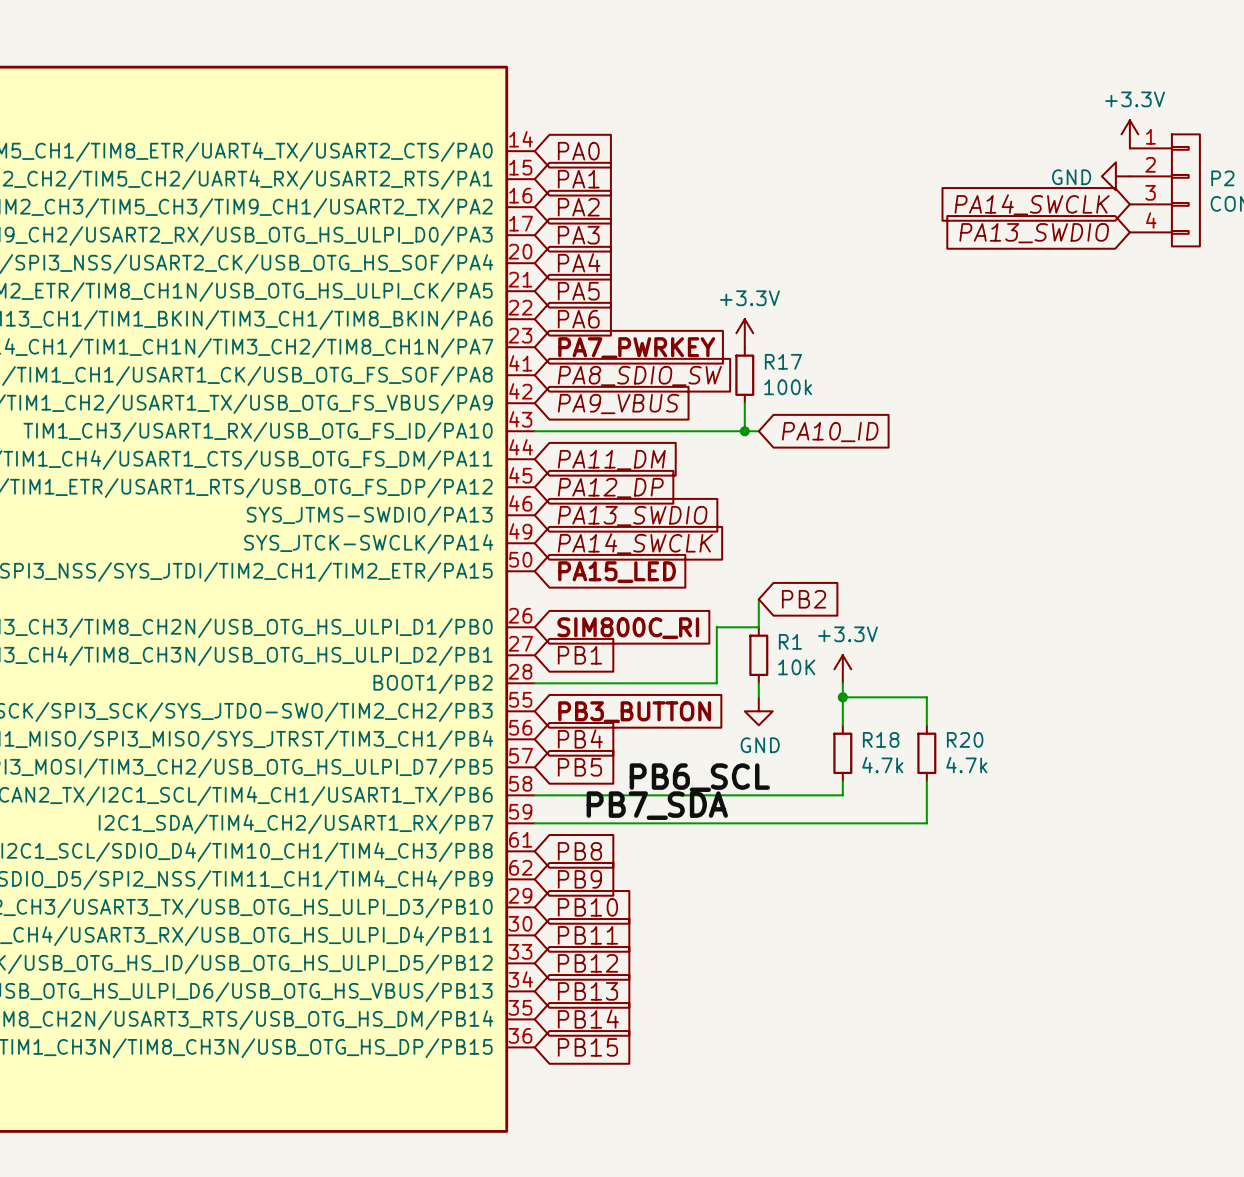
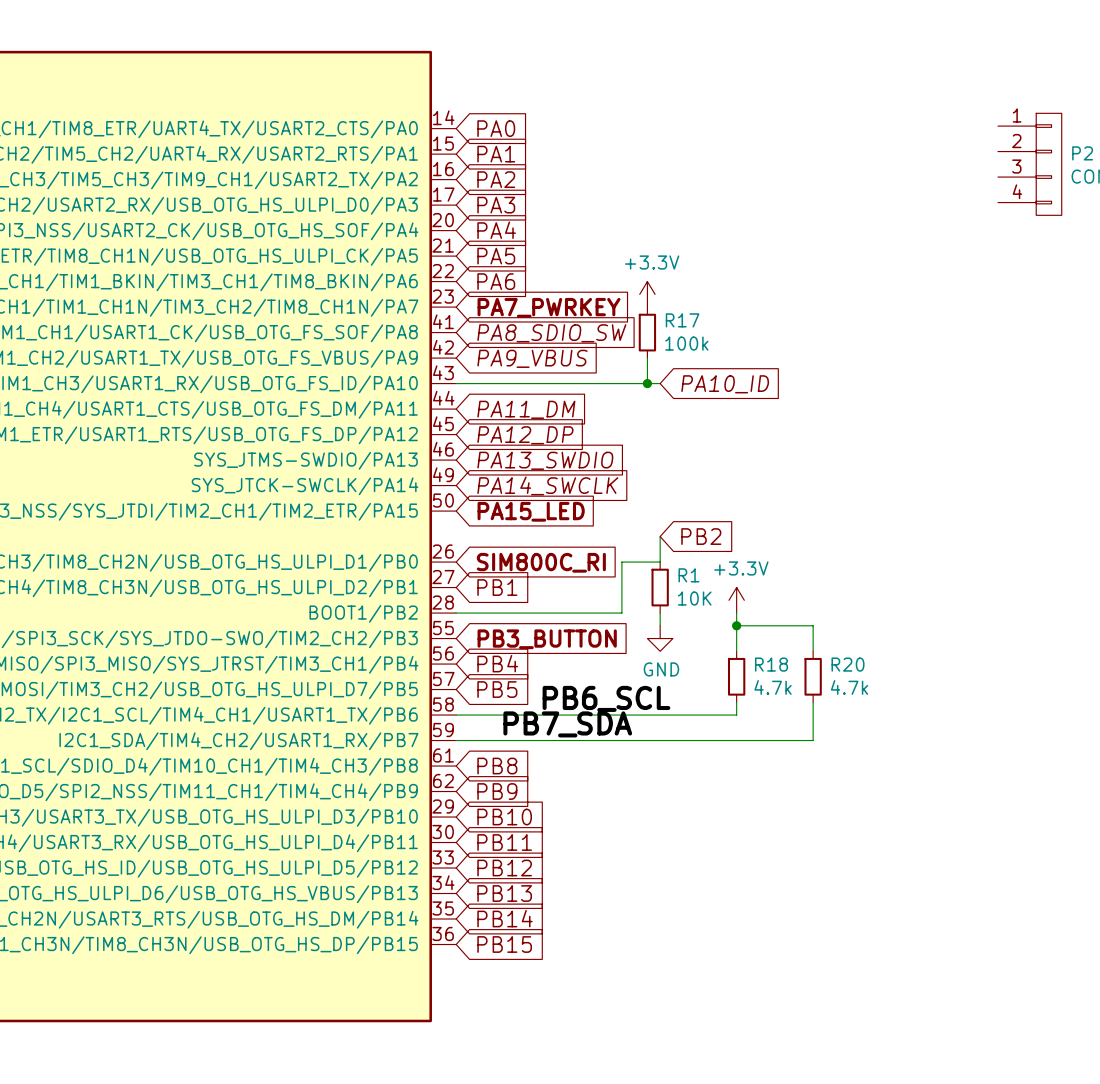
power symbol: +3.3V (1129, 134) -> none
power symbol: GND (1115, 176) -> none
global label: PA14_SWCLK (1032, 204) -> none
global label: PA13_SWDIO (1034, 233) -> none

